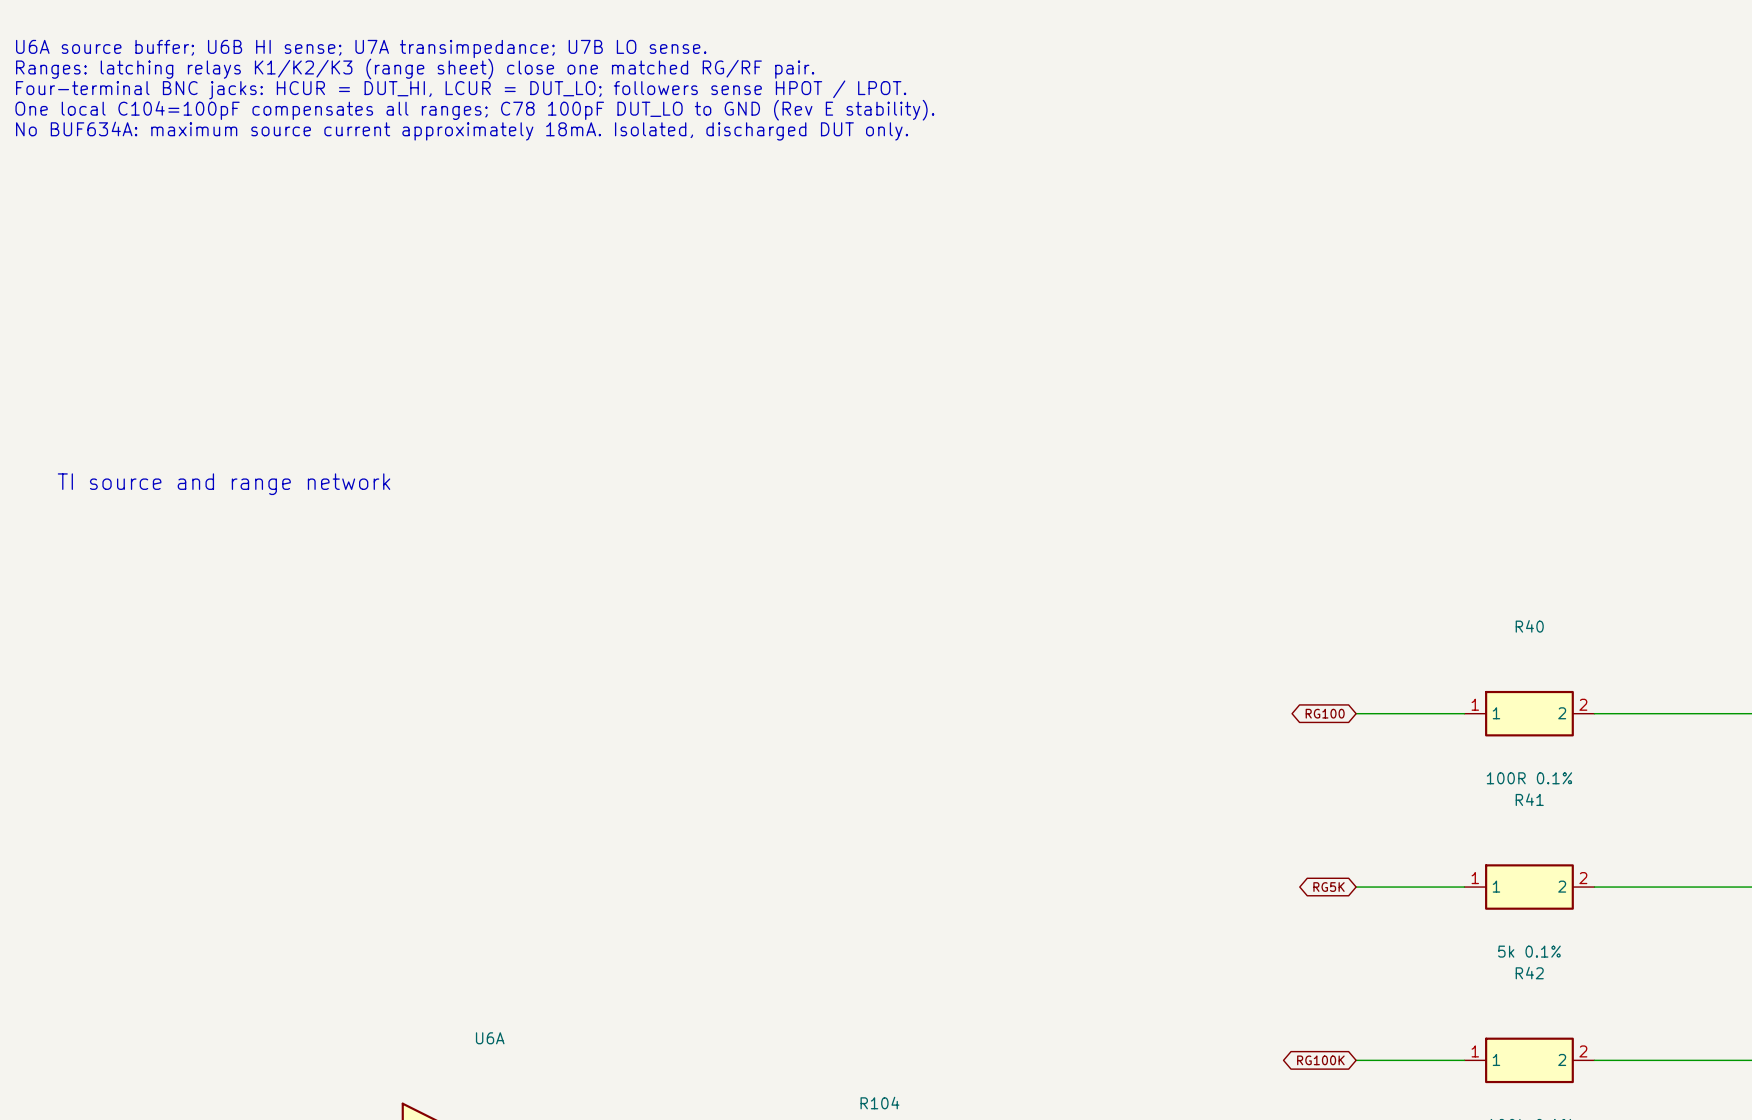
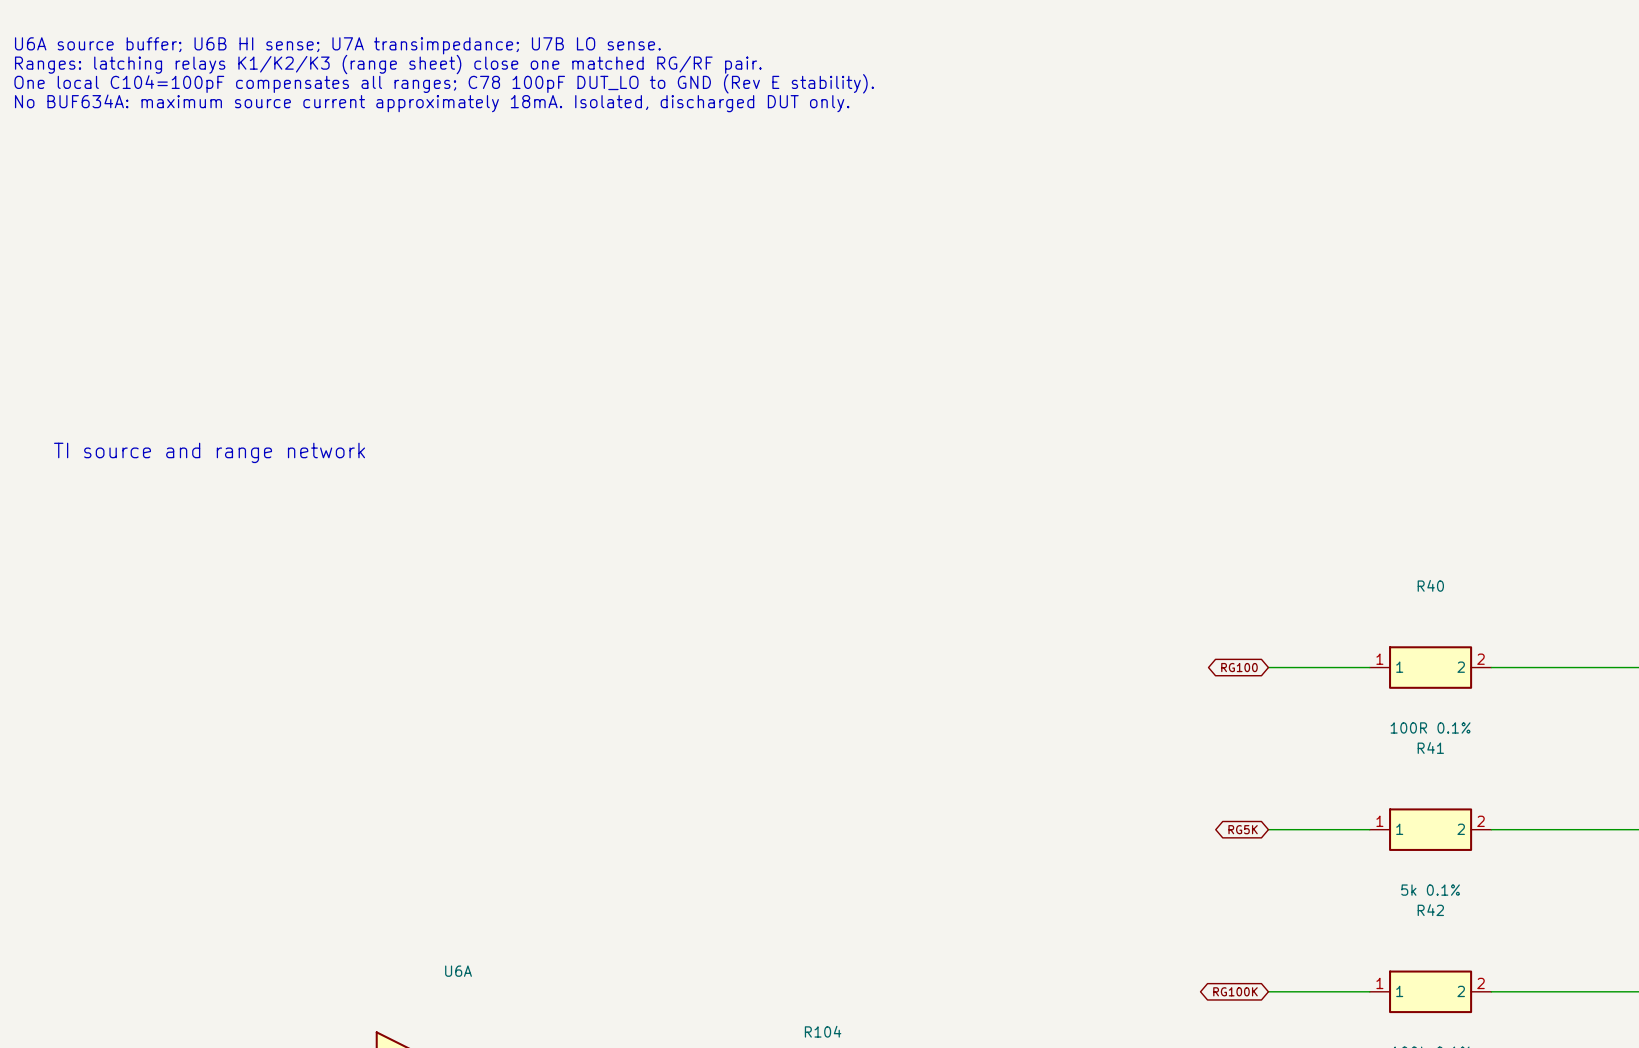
text: Four-terminal BNC jacks: HCUR = DUT_HI, LCUR = DUT_LO; followers sense HPOT / LPOT. (461, 89) -> One local C104=100pF compensates all ranges; C78 100pF DUT_LO to GND (Rev E stability). (444, 83)
text: One local C104=100pF compensates all ranges; C78 100pF DUT_LO to GND (Rev E stability). (474, 110) -> No BUF634A: maximum source current approximately 18mA. Isolated, discharged DUT only. (432, 103)
text: No BUF634A: maximum source current approximately 18mA. Isolated, discharged DUT only. (462, 131) -> none

